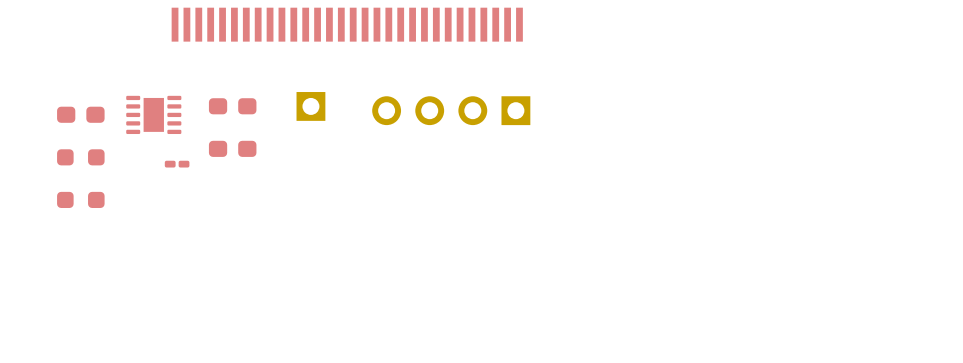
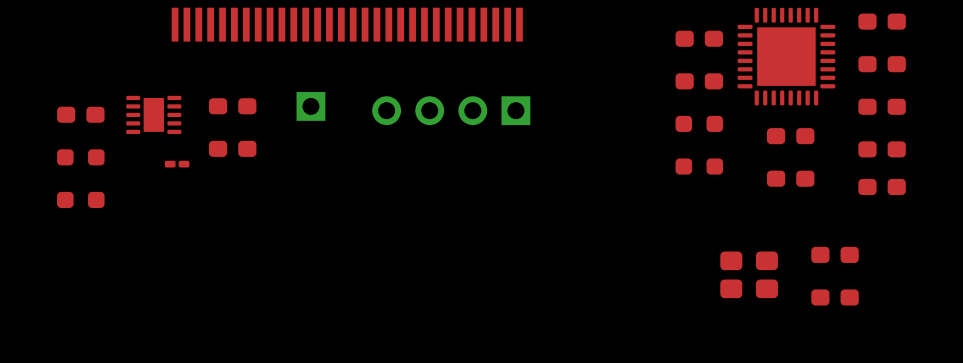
part: none -> (882, 21)
part: none -> (699, 38)
part: none -> (786, 56)
part: none -> (882, 64)
part: none -> (699, 81)
part: none -> (882, 106)
part: none -> (699, 123)
part: none -> (790, 136)
part: none -> (882, 149)
part: none -> (699, 166)
part: none -> (790, 178)
part: none -> (882, 187)
part: none -> (835, 254)
part: none -> (749, 274)
part: none -> (835, 297)

